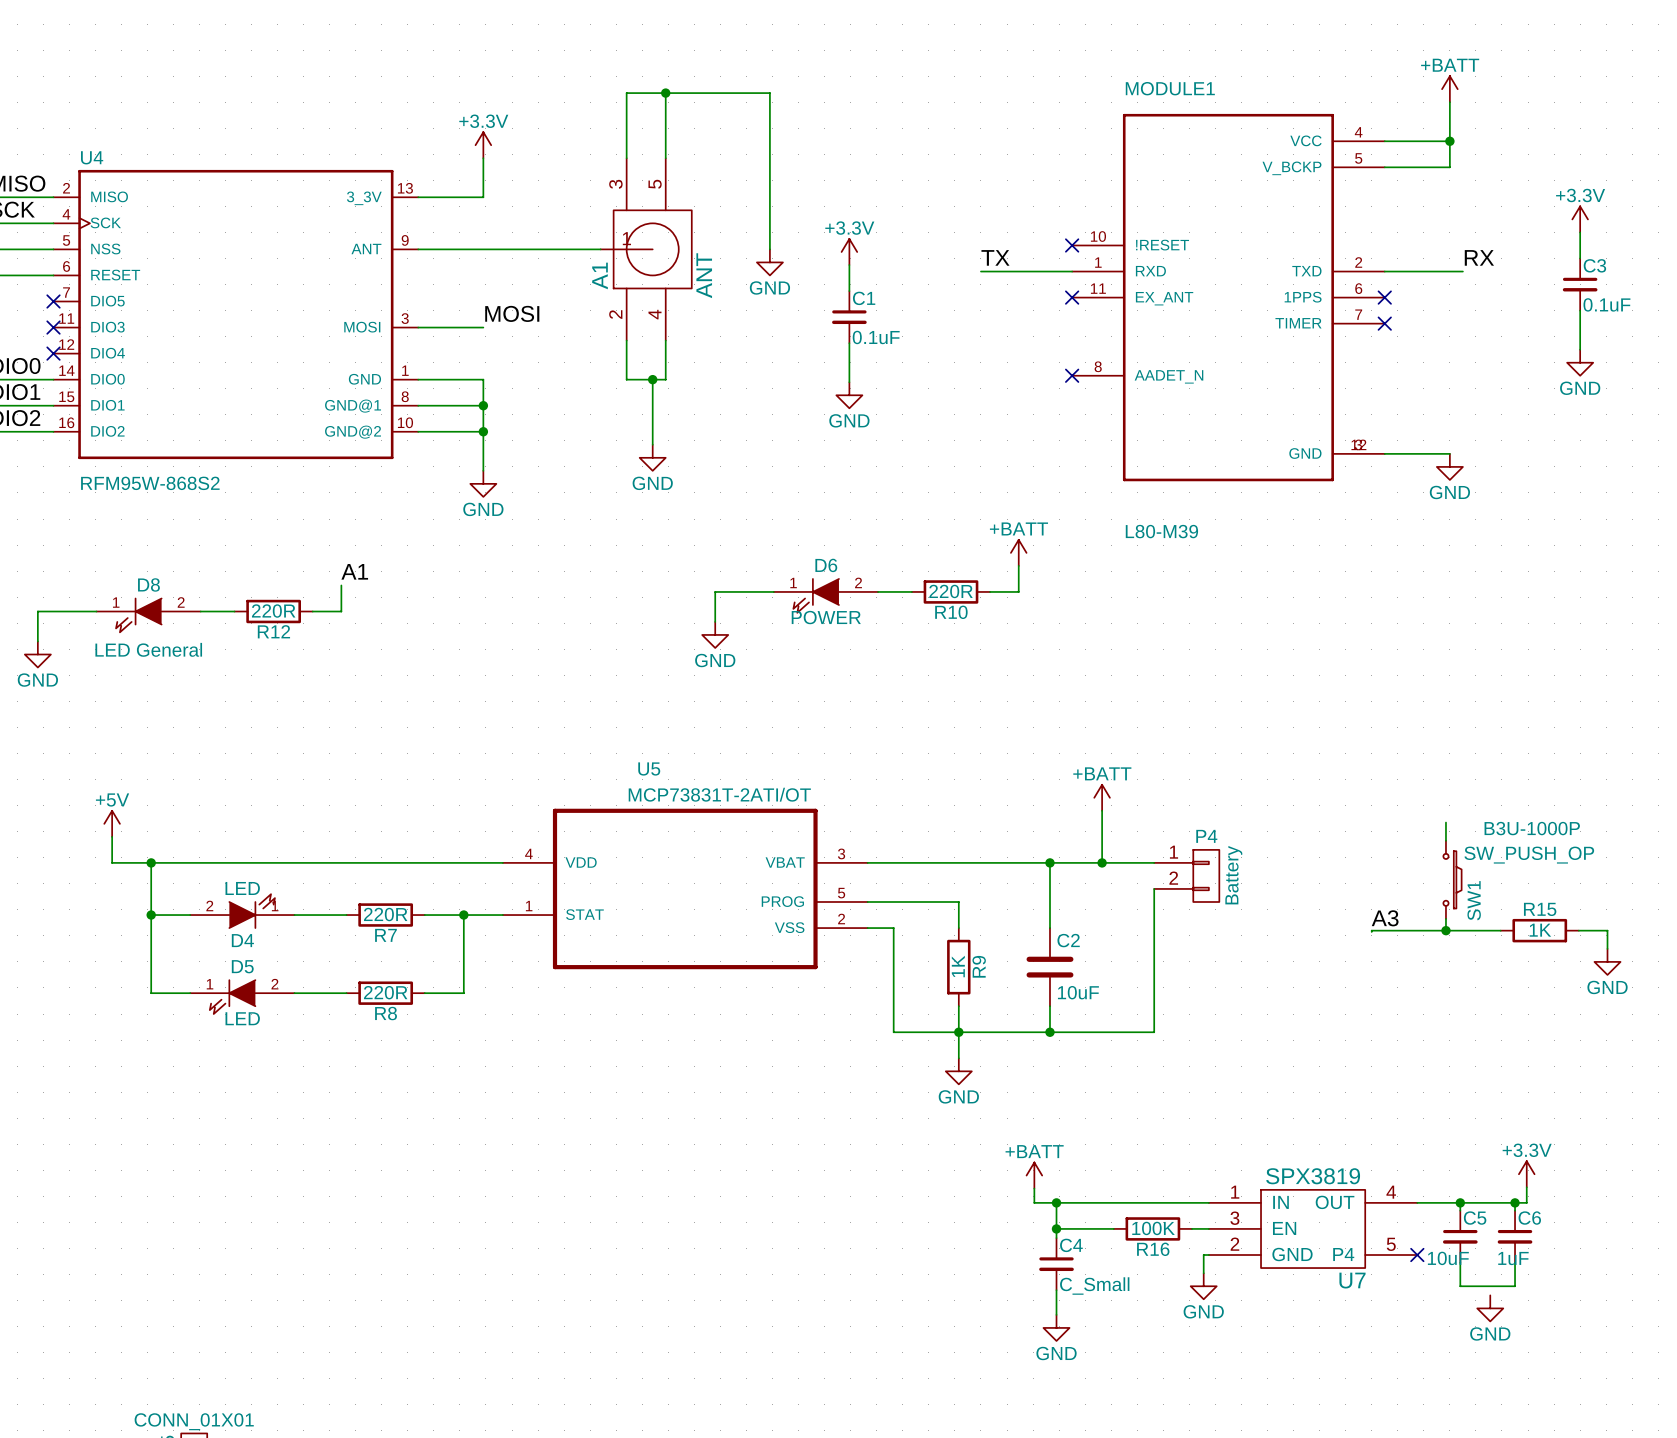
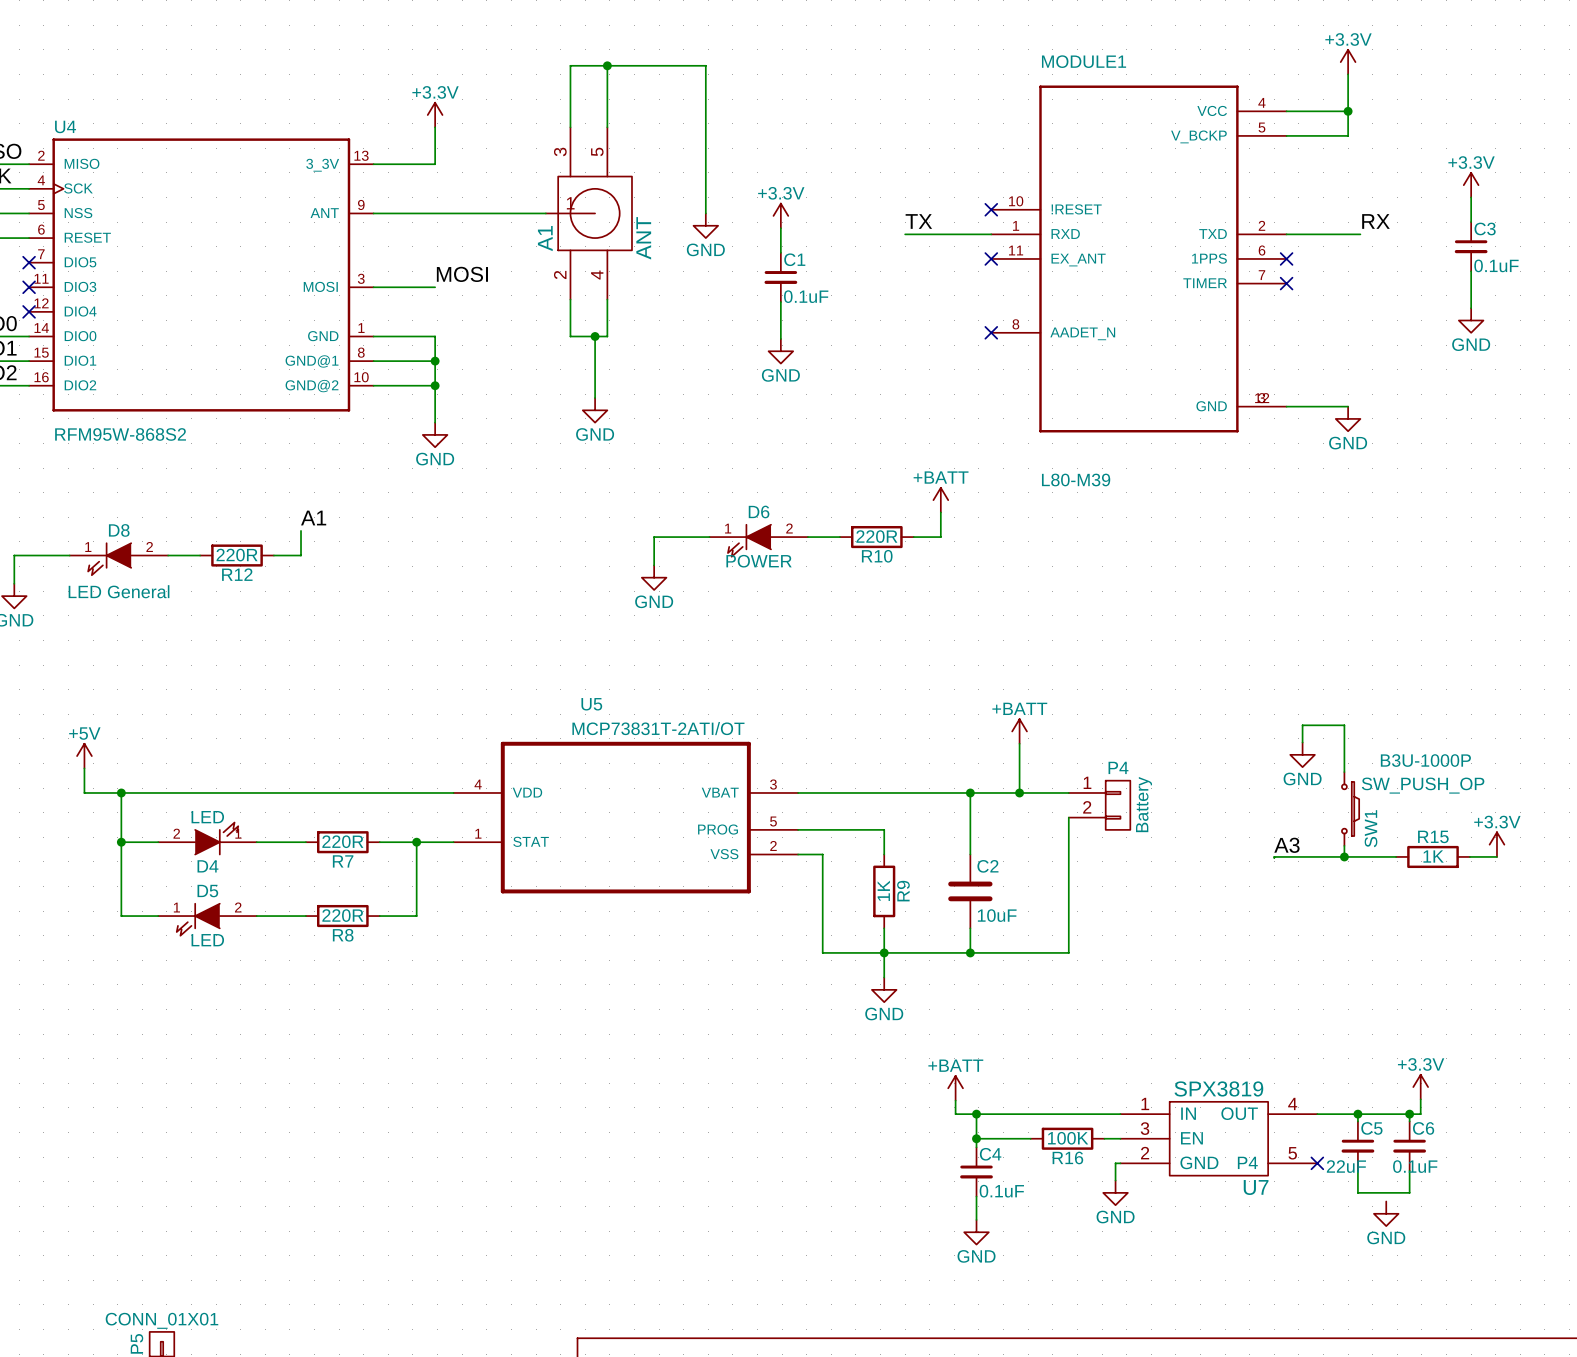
power symbol: +BATT (1449, 89) -> +3.3V (1348, 62)
wire: none -> (1302, 742) (1302, 725) (1344, 725) (1344, 754)
power symbol: none -> +3.3V (1496, 844)
wire: (1607, 930) (1607, 948) -> none
power symbol position: GND (1607, 961) -> GND (1302, 754)
C5 value: 10uF (1448, 1258) -> 22uF (1346, 1166)
C6 value: 1uF (1513, 1258) -> 0.1uF (1415, 1166)
C4 value: C_Small (1094, 1286) -> 0.1uF (1001, 1191)

